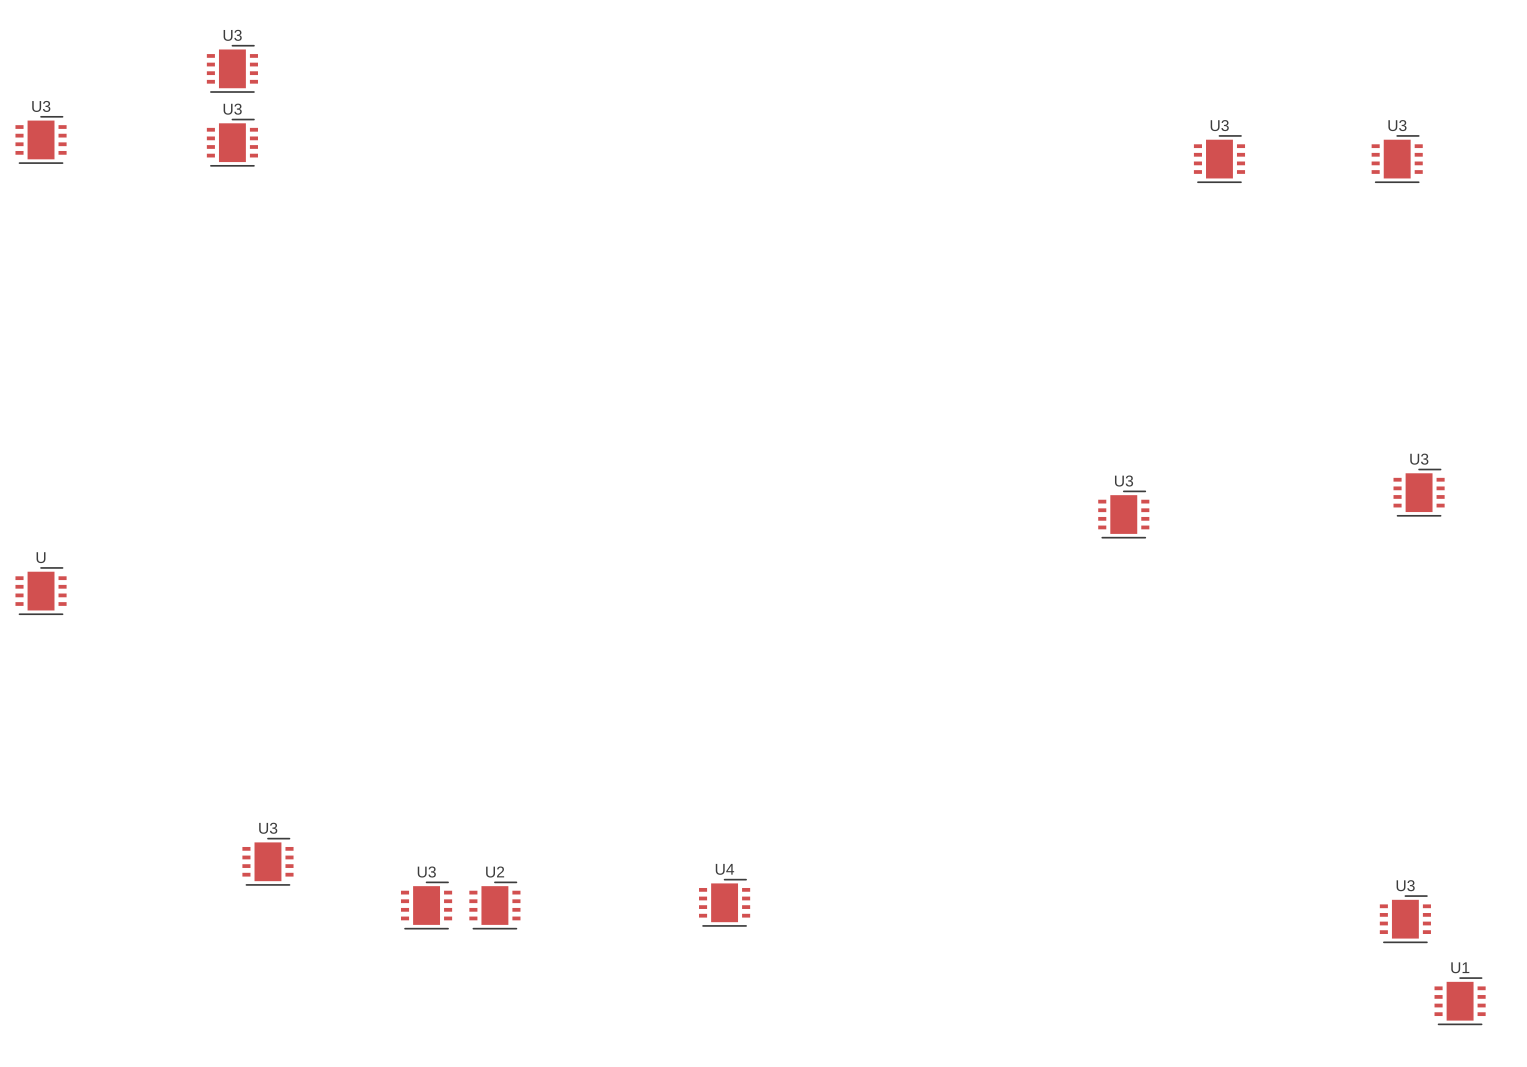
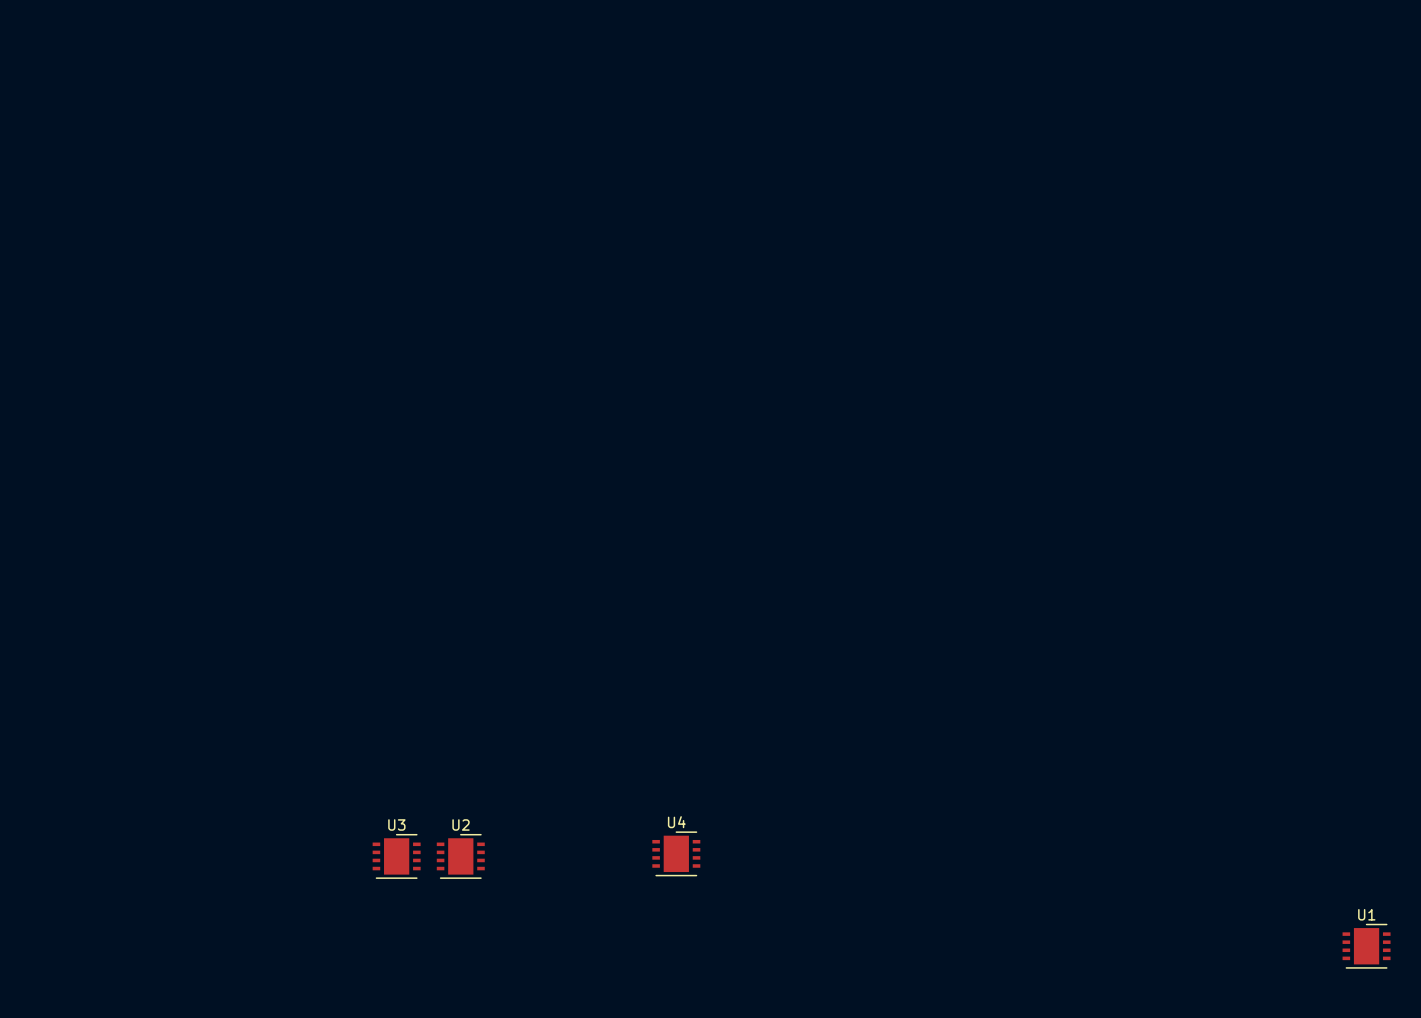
U3: (232, 68) -> none
U3: (41, 139) -> none
U3: (232, 142) -> none
U3: (1219, 159) -> none
U3: (1397, 159) -> none
U3: (1419, 492) -> none
U3: (1123, 514) -> none
U: (41, 591) -> none
U3: (267, 861) -> none
U3: (1405, 919) -> none

